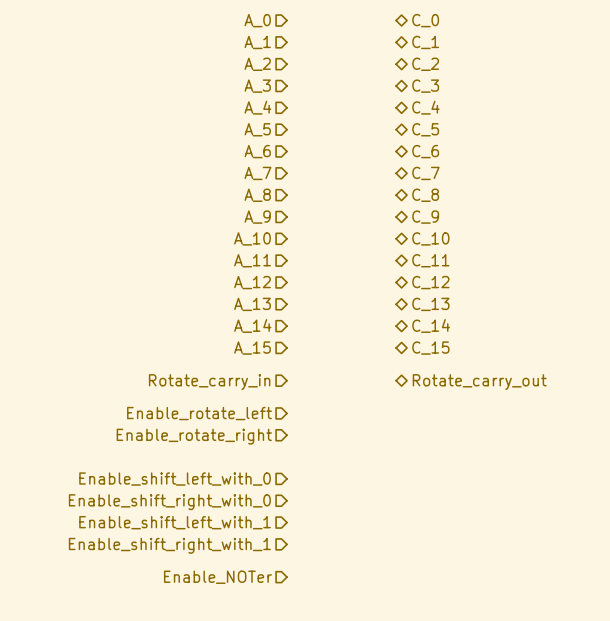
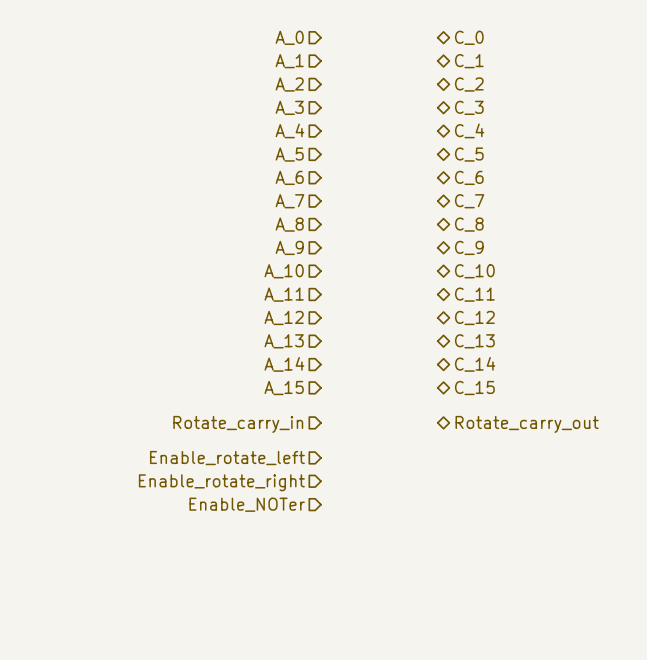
hierarchical label: Enable_shift_left_with_0 (175, 479) -> none
hierarchical label: Enable_shift_right_with_0 (169, 502) -> none
hierarchical label: Enable_shift_left_with_1 (175, 522) -> none
hierarchical label: Enable_shift_right_with_1 (169, 545) -> none
hierarchical label position: Enable_NOTer (217, 577) -> Enable_NOTer (247, 504)

